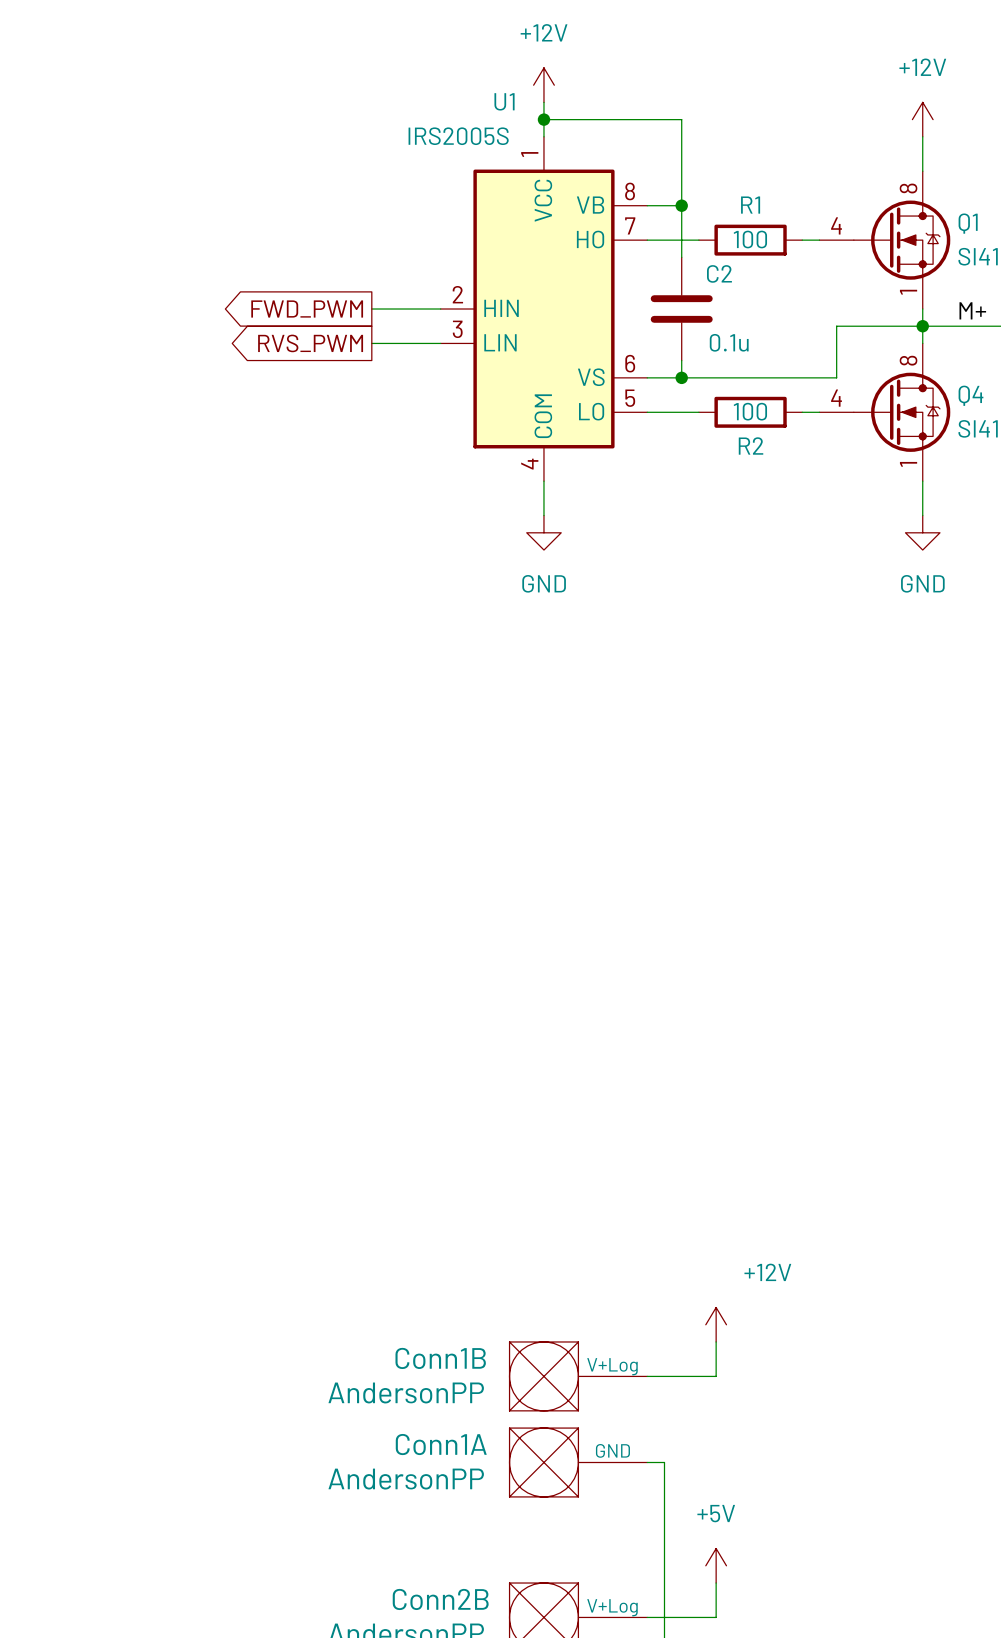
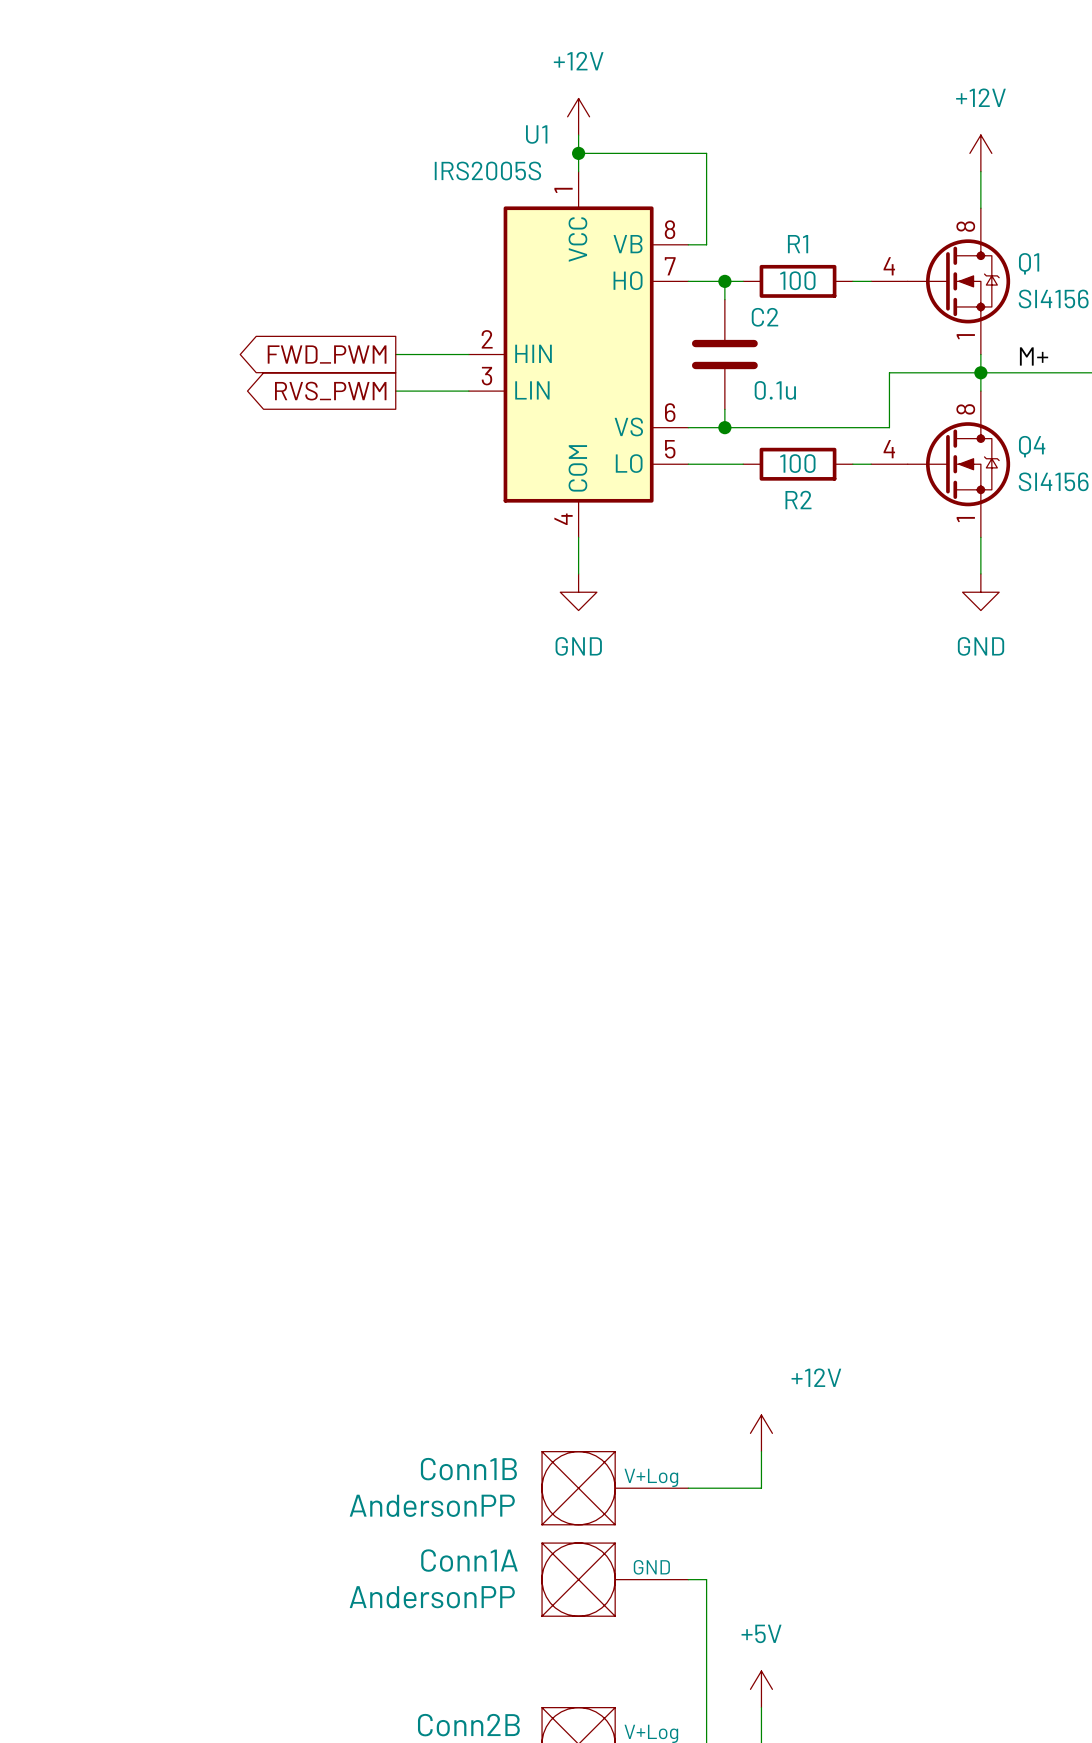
wire: (664, 119) (681, 119) (681, 240) -> (706, 153) (706, 244)
wire: (664, 205) (681, 205) -> none
junction position: (681, 205) -> (724, 281)

